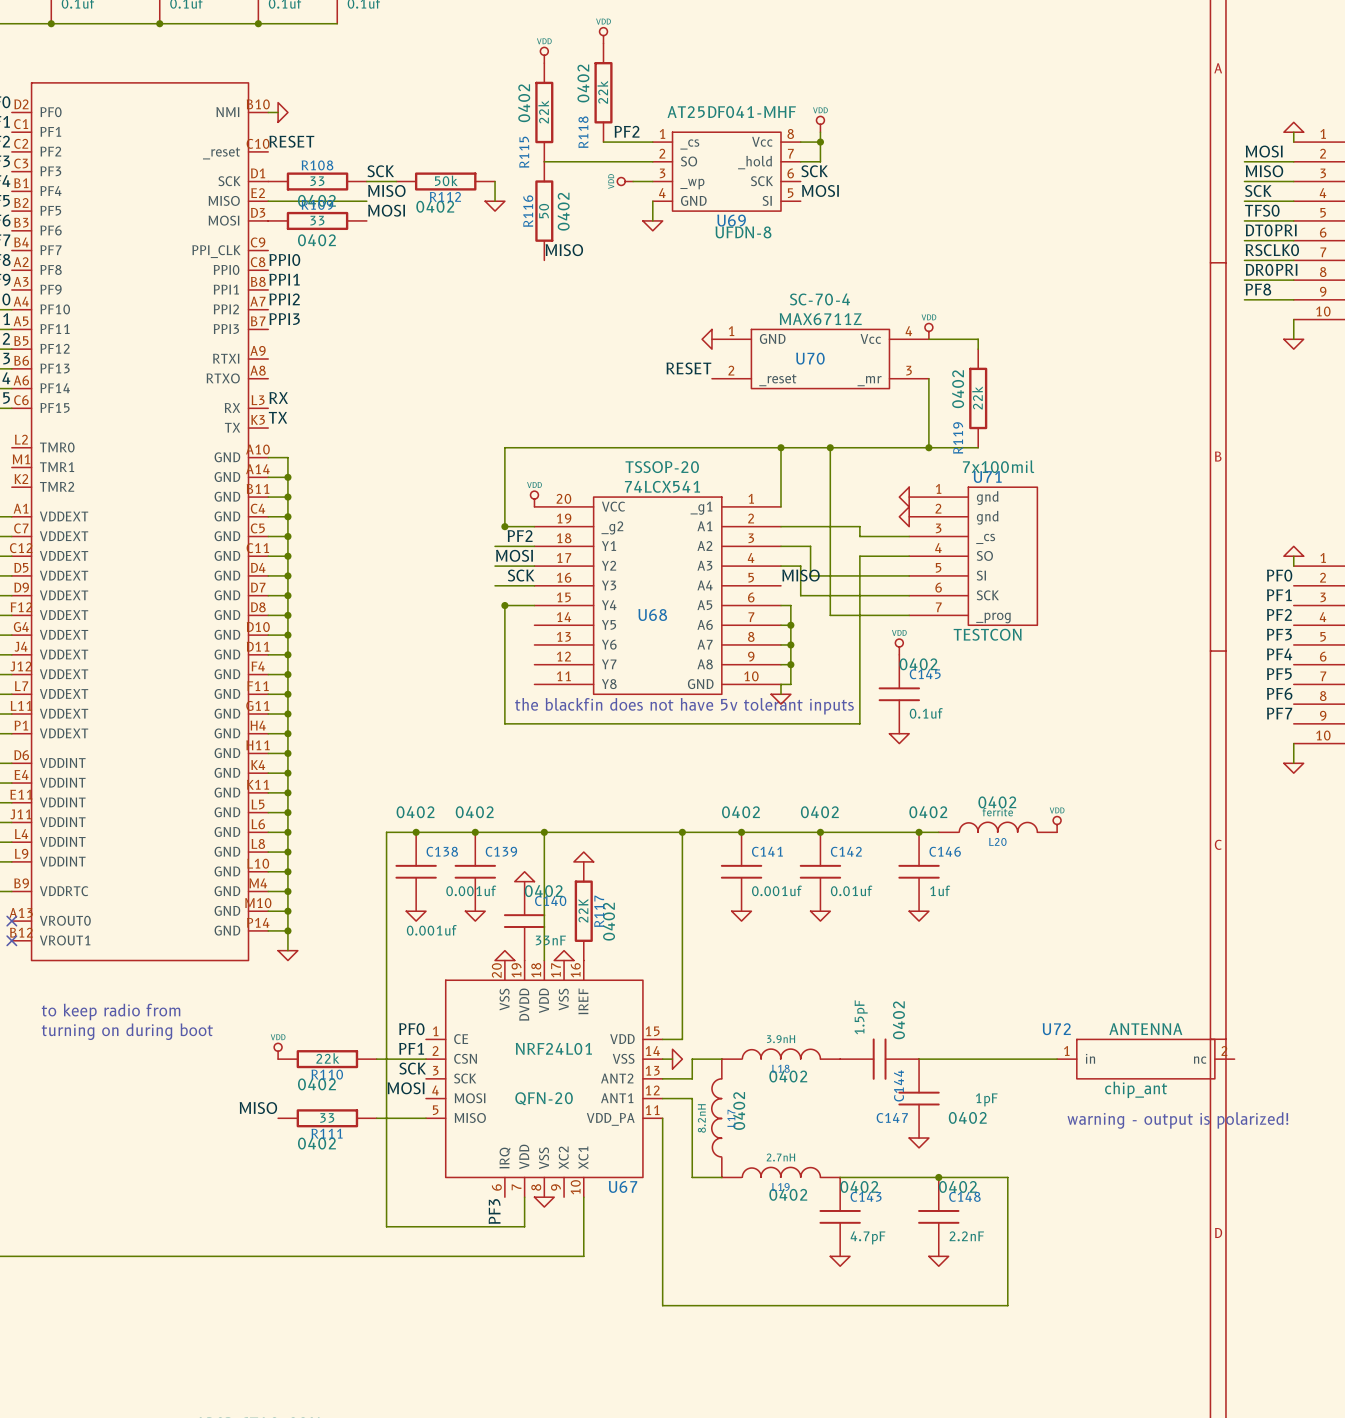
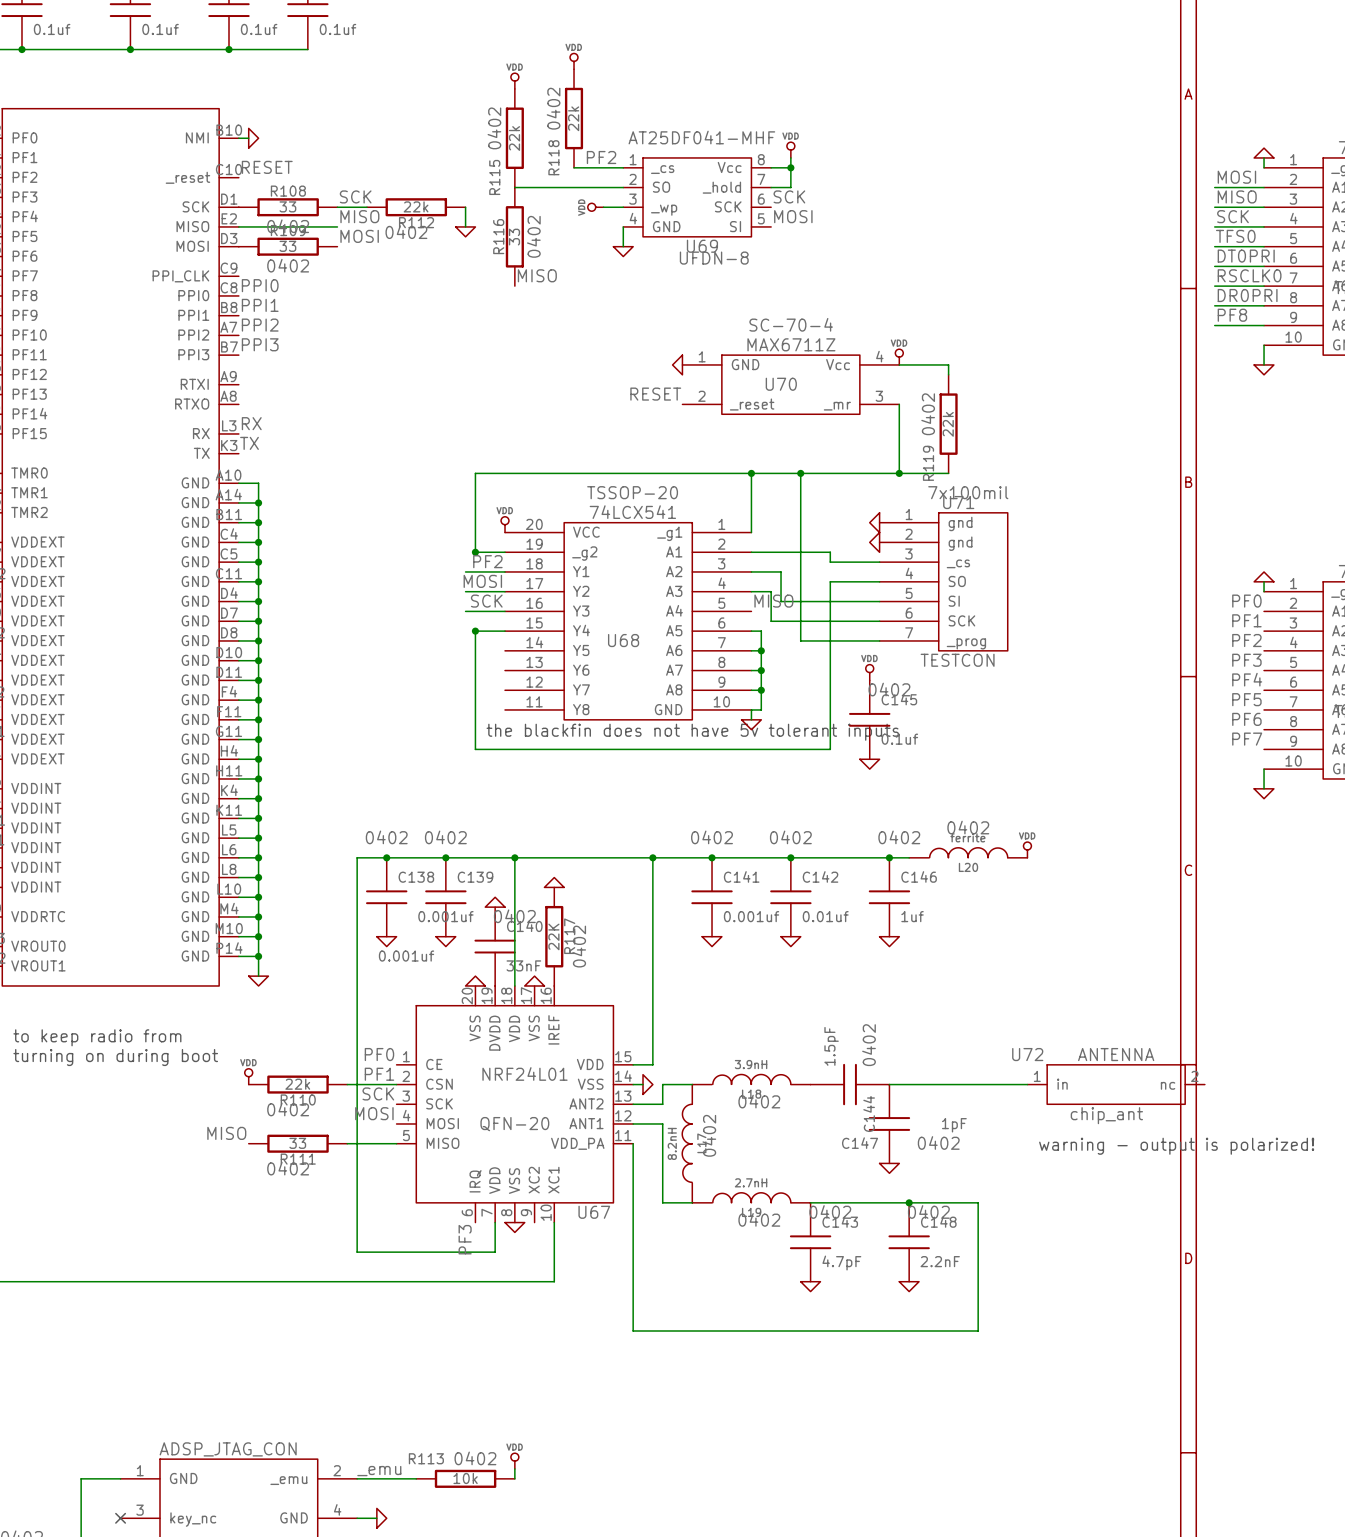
R112 value: 50k (446, 180) -> 22k (416, 206)
R116 value: 50 (544, 211) -> 33 (514, 237)

